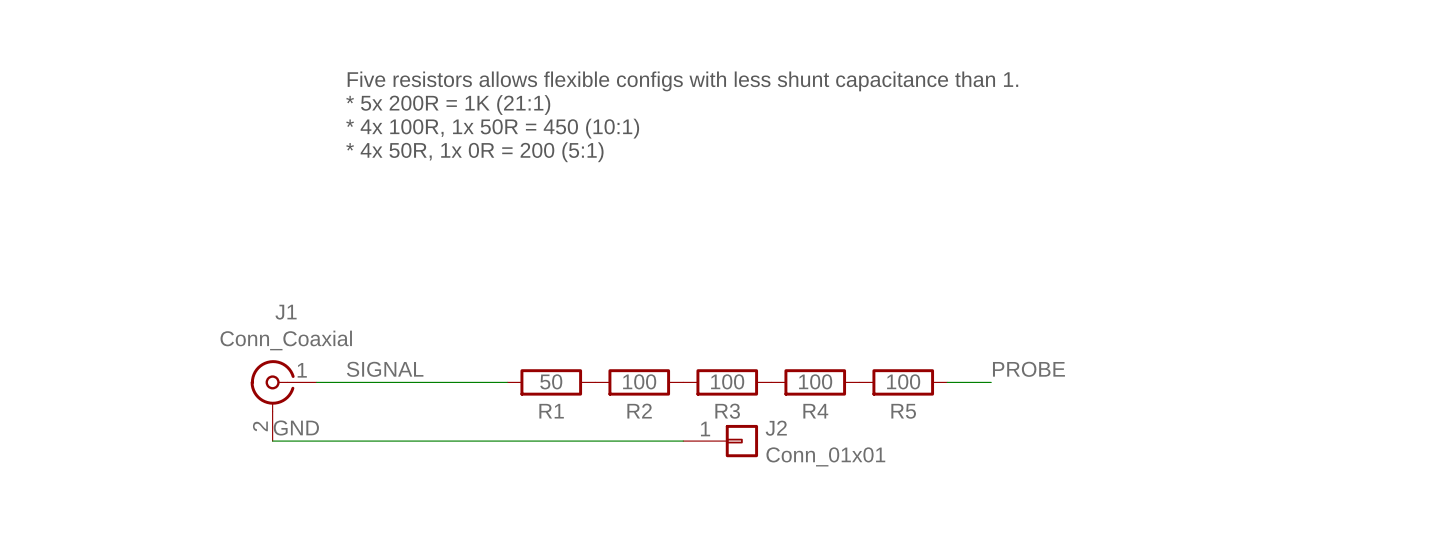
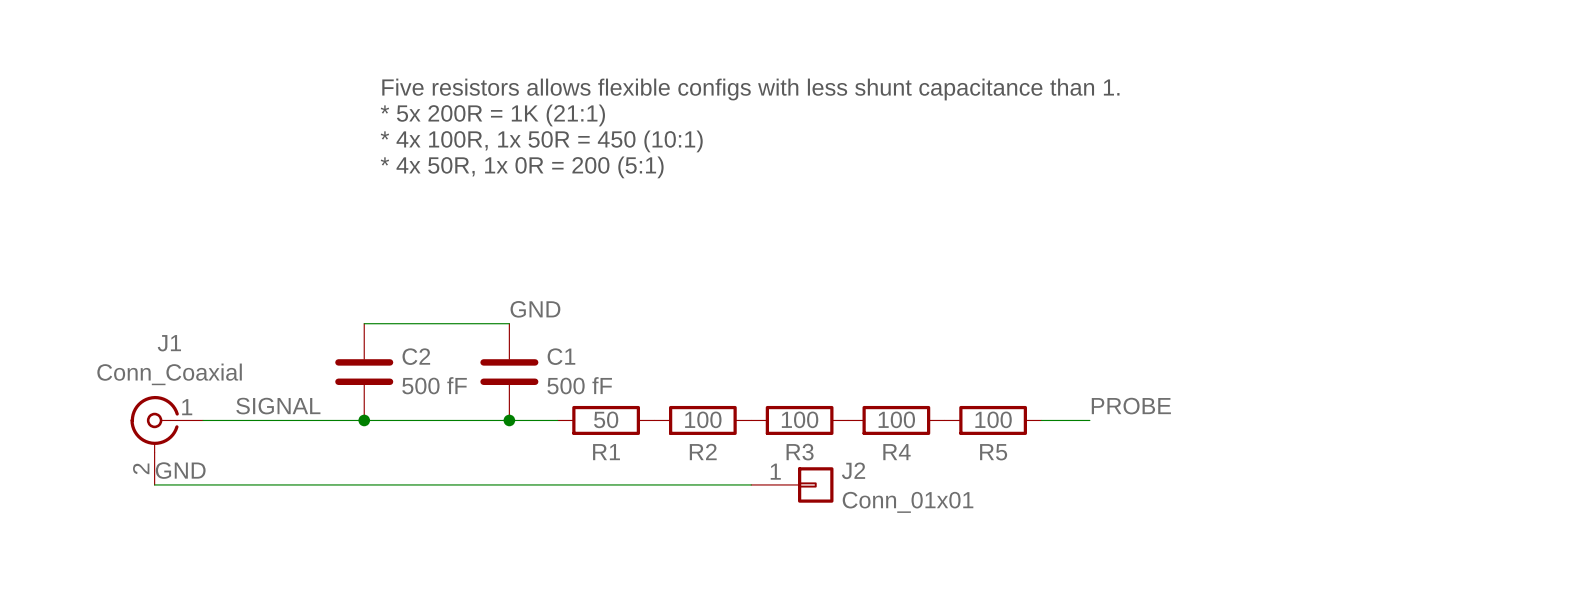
label: none -> GND (535, 309)
wire: none -> (364, 323) (509, 323)
C2: none -> 500 fF (364, 372)
C1: none -> 500 fF (509, 372)
label position: SIGNAL (385, 369) -> SIGNAL (278, 406)
wire: none -> (202, 420) (348, 420)
junction: none -> (364, 420)
junction: none -> (509, 420)
J1 position: (283, 400) -> (166, 440)
label: none -> GND (180, 470)
label: GND (296, 427) -> none
wire: none -> (154, 484) (299, 484)

